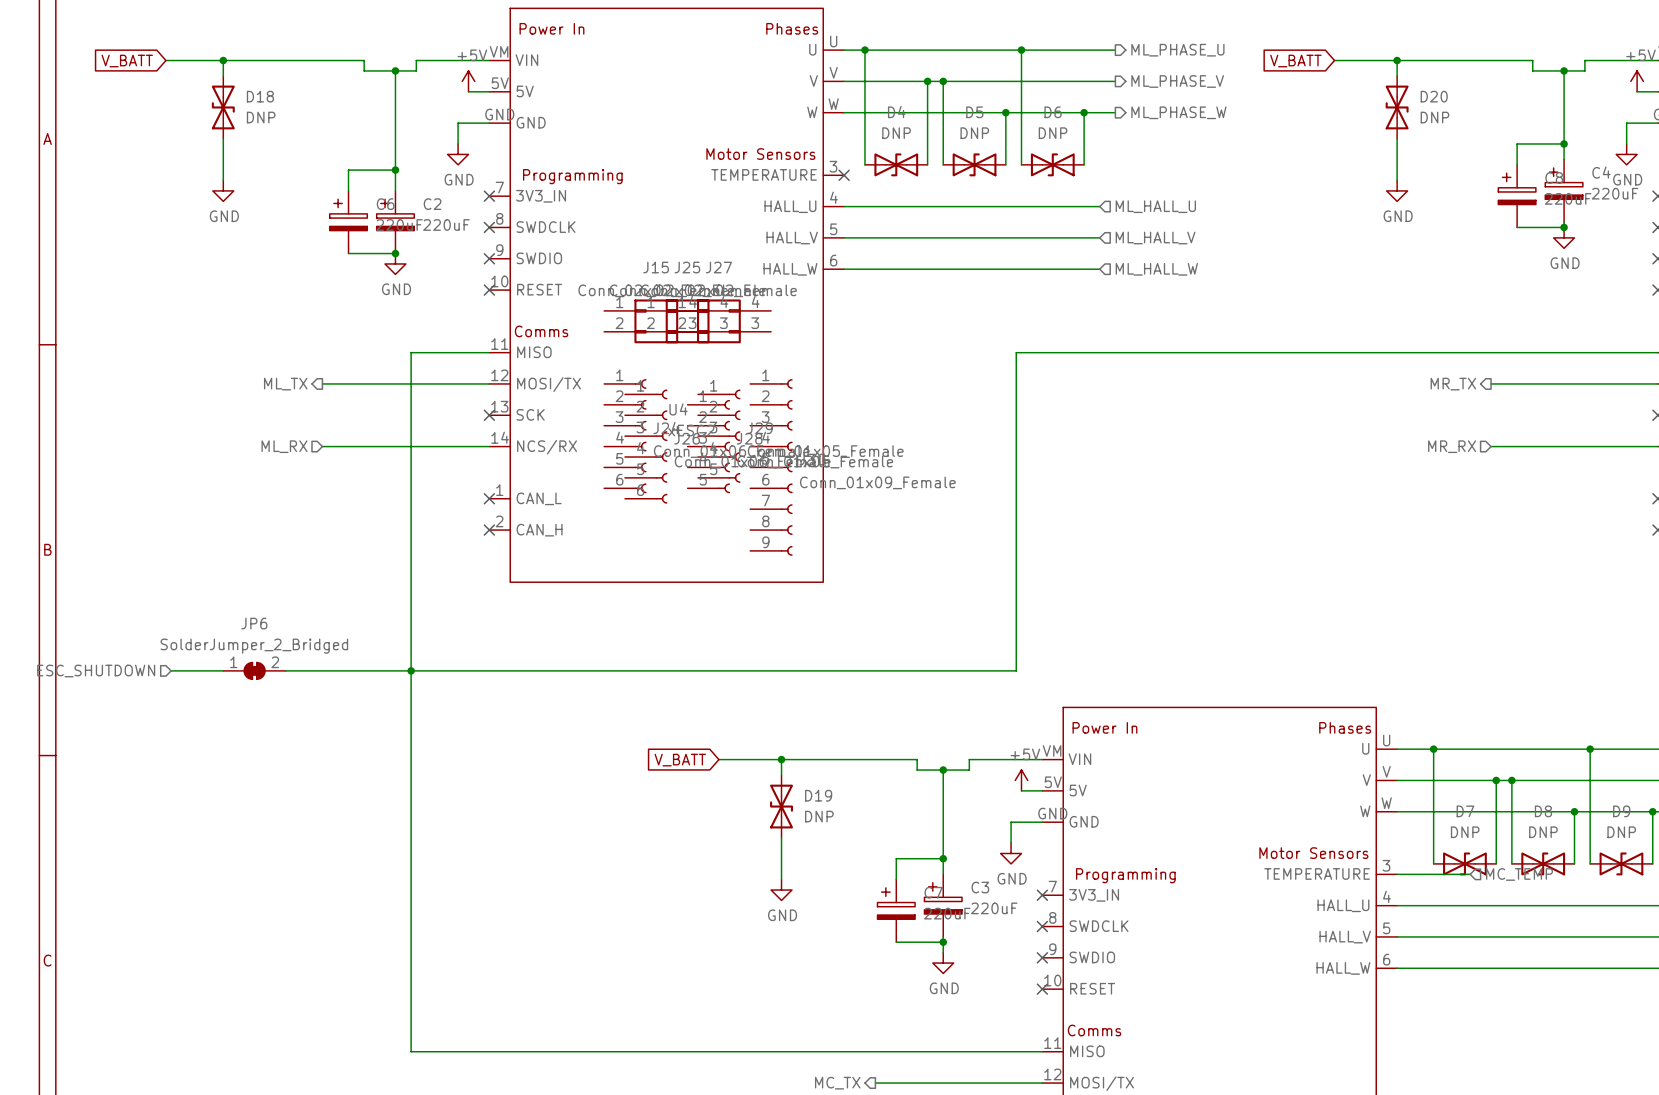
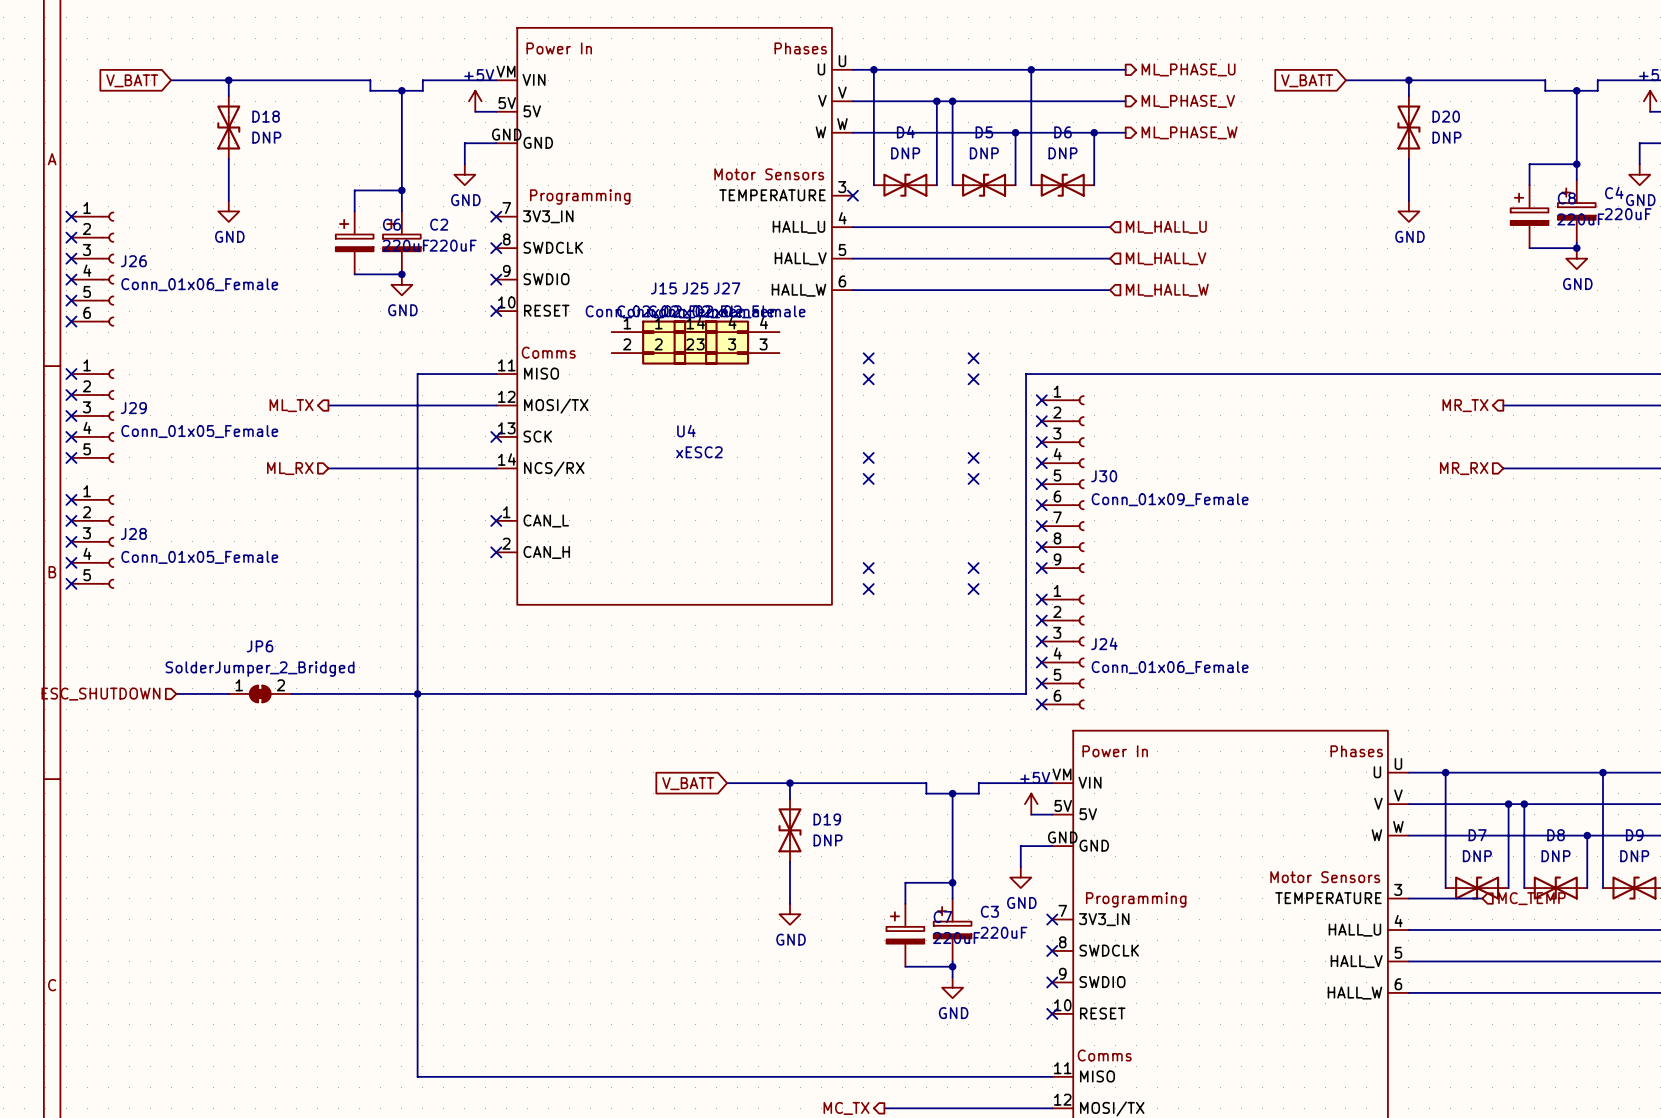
no-connect mark: none -> (71, 216)
no-connect mark: none -> (71, 237)
no-connect mark: none -> (71, 258)
no-connect mark: none -> (71, 279)
no-connect mark: none -> (71, 300)
no-connect mark: none -> (71, 321)
no-connect mark: none -> (868, 358)
no-connect mark: none -> (973, 358)
no-connect mark: none -> (71, 374)
no-connect mark: none -> (868, 379)
no-connect mark: none -> (973, 379)
no-connect mark: none -> (71, 395)
no-connect mark: none -> (1041, 400)
no-connect mark: none -> (71, 415)
no-connect mark: none -> (1041, 421)
no-connect mark: none -> (71, 436)
no-connect mark: none -> (1041, 442)
no-connect mark: none -> (71, 457)
J24 position: (625, 436) -> (1063, 652)
J29 position: (719, 436) -> (92, 415)
no-connect mark: none -> (868, 457)
no-connect mark: none -> (973, 457)
no-connect mark: none -> (1041, 463)
J26 position: (646, 446) -> (92, 269)
J28 position: (708, 446) -> (92, 541)
no-connect mark: none -> (868, 478)
no-connect mark: none -> (973, 478)
no-connect mark: none -> (1041, 484)
J30 position: (771, 467) -> (1063, 484)
no-connect mark: none -> (71, 499)
no-connect mark: none -> (1041, 505)
no-connect mark: none -> (71, 520)
no-connect mark: none -> (1041, 526)
no-connect mark: none -> (71, 541)
no-connect mark: none -> (1041, 547)
no-connect mark: none -> (71, 562)
no-connect mark: none -> (868, 568)
no-connect mark: none -> (973, 568)
no-connect mark: none -> (1041, 568)
no-connect mark: none -> (71, 583)
no-connect mark: none -> (868, 589)
no-connect mark: none -> (973, 589)
no-connect mark: none -> (1041, 599)
no-connect mark: none -> (1041, 620)
no-connect mark: none -> (1041, 641)
no-connect mark: none -> (1041, 662)
no-connect mark: none -> (1041, 683)
no-connect mark: none -> (1041, 704)

